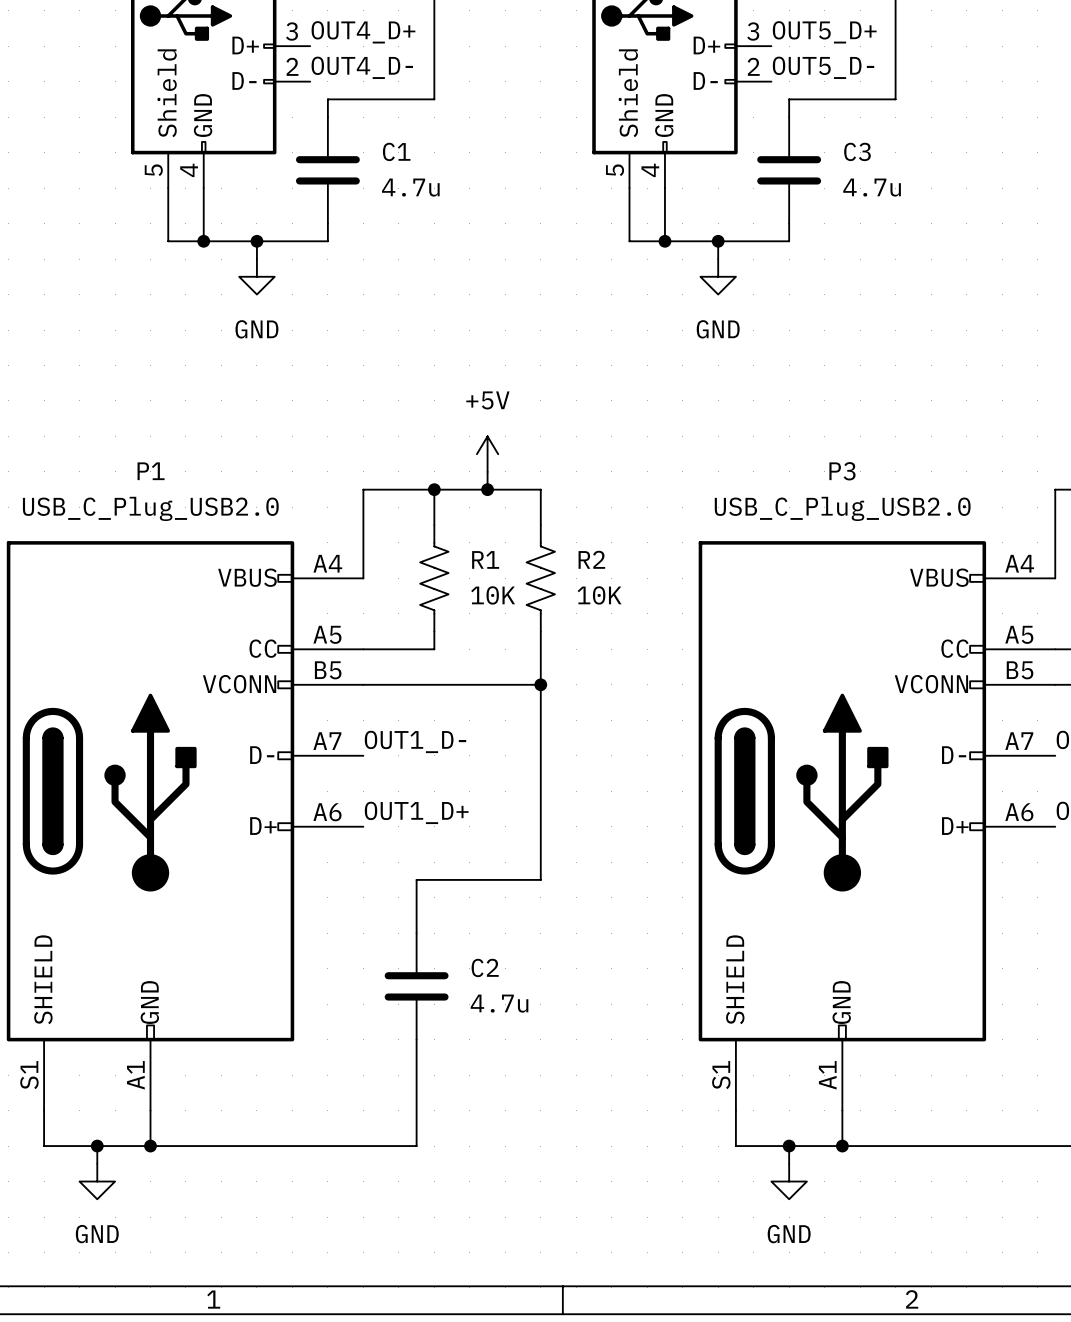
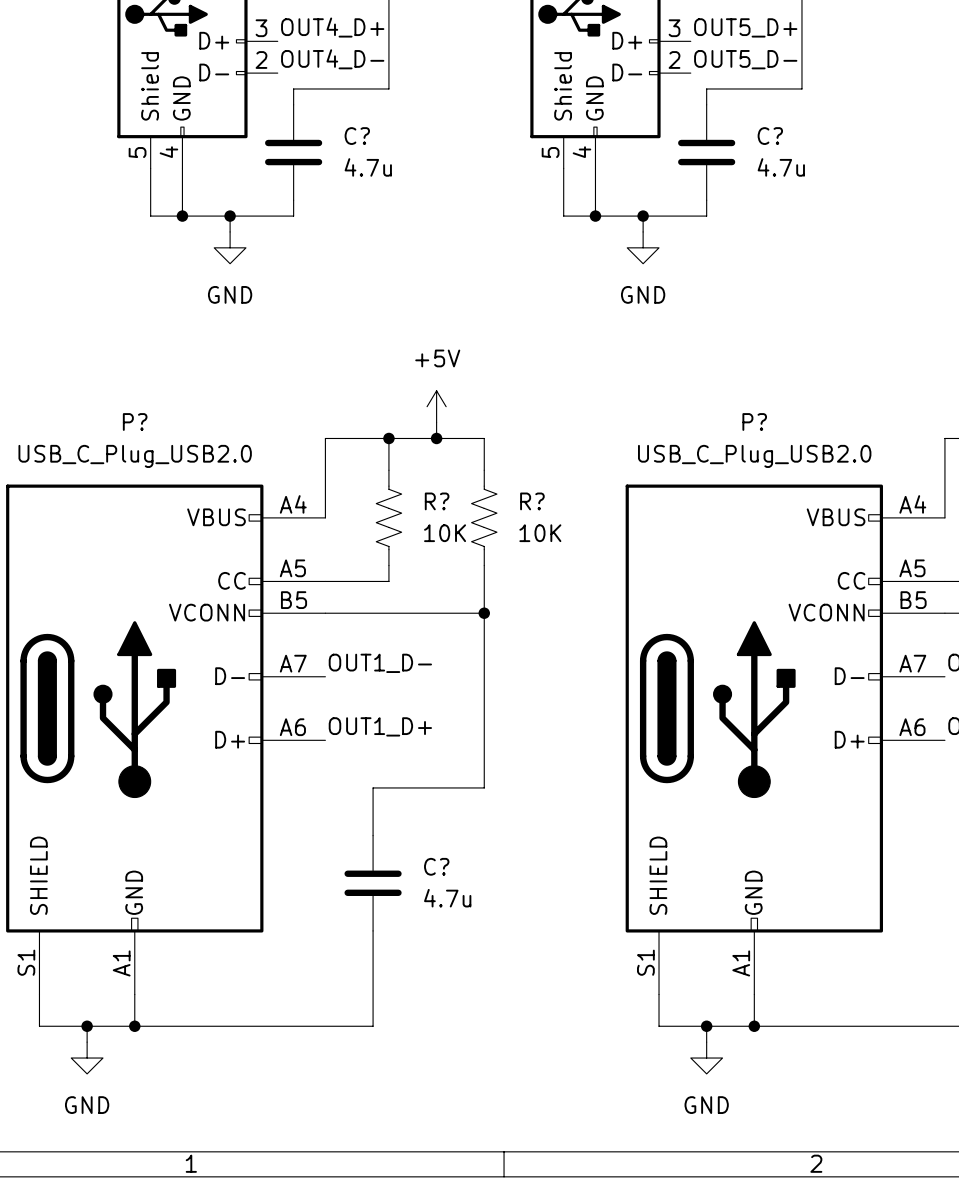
C1 name: C1 (396, 151) -> C? (357, 136)
C3 name: C3 (857, 151) -> C? (770, 136)
P1 name: P1 (151, 471) -> P? (135, 422)
P3 name: P3 (842, 471) -> P? (754, 422)
R1 name: R1 (485, 559) -> R? (437, 501)
R2 name: R2 (591, 559) -> R? (532, 501)
C2 name: C2 (485, 967) -> C? (436, 866)

